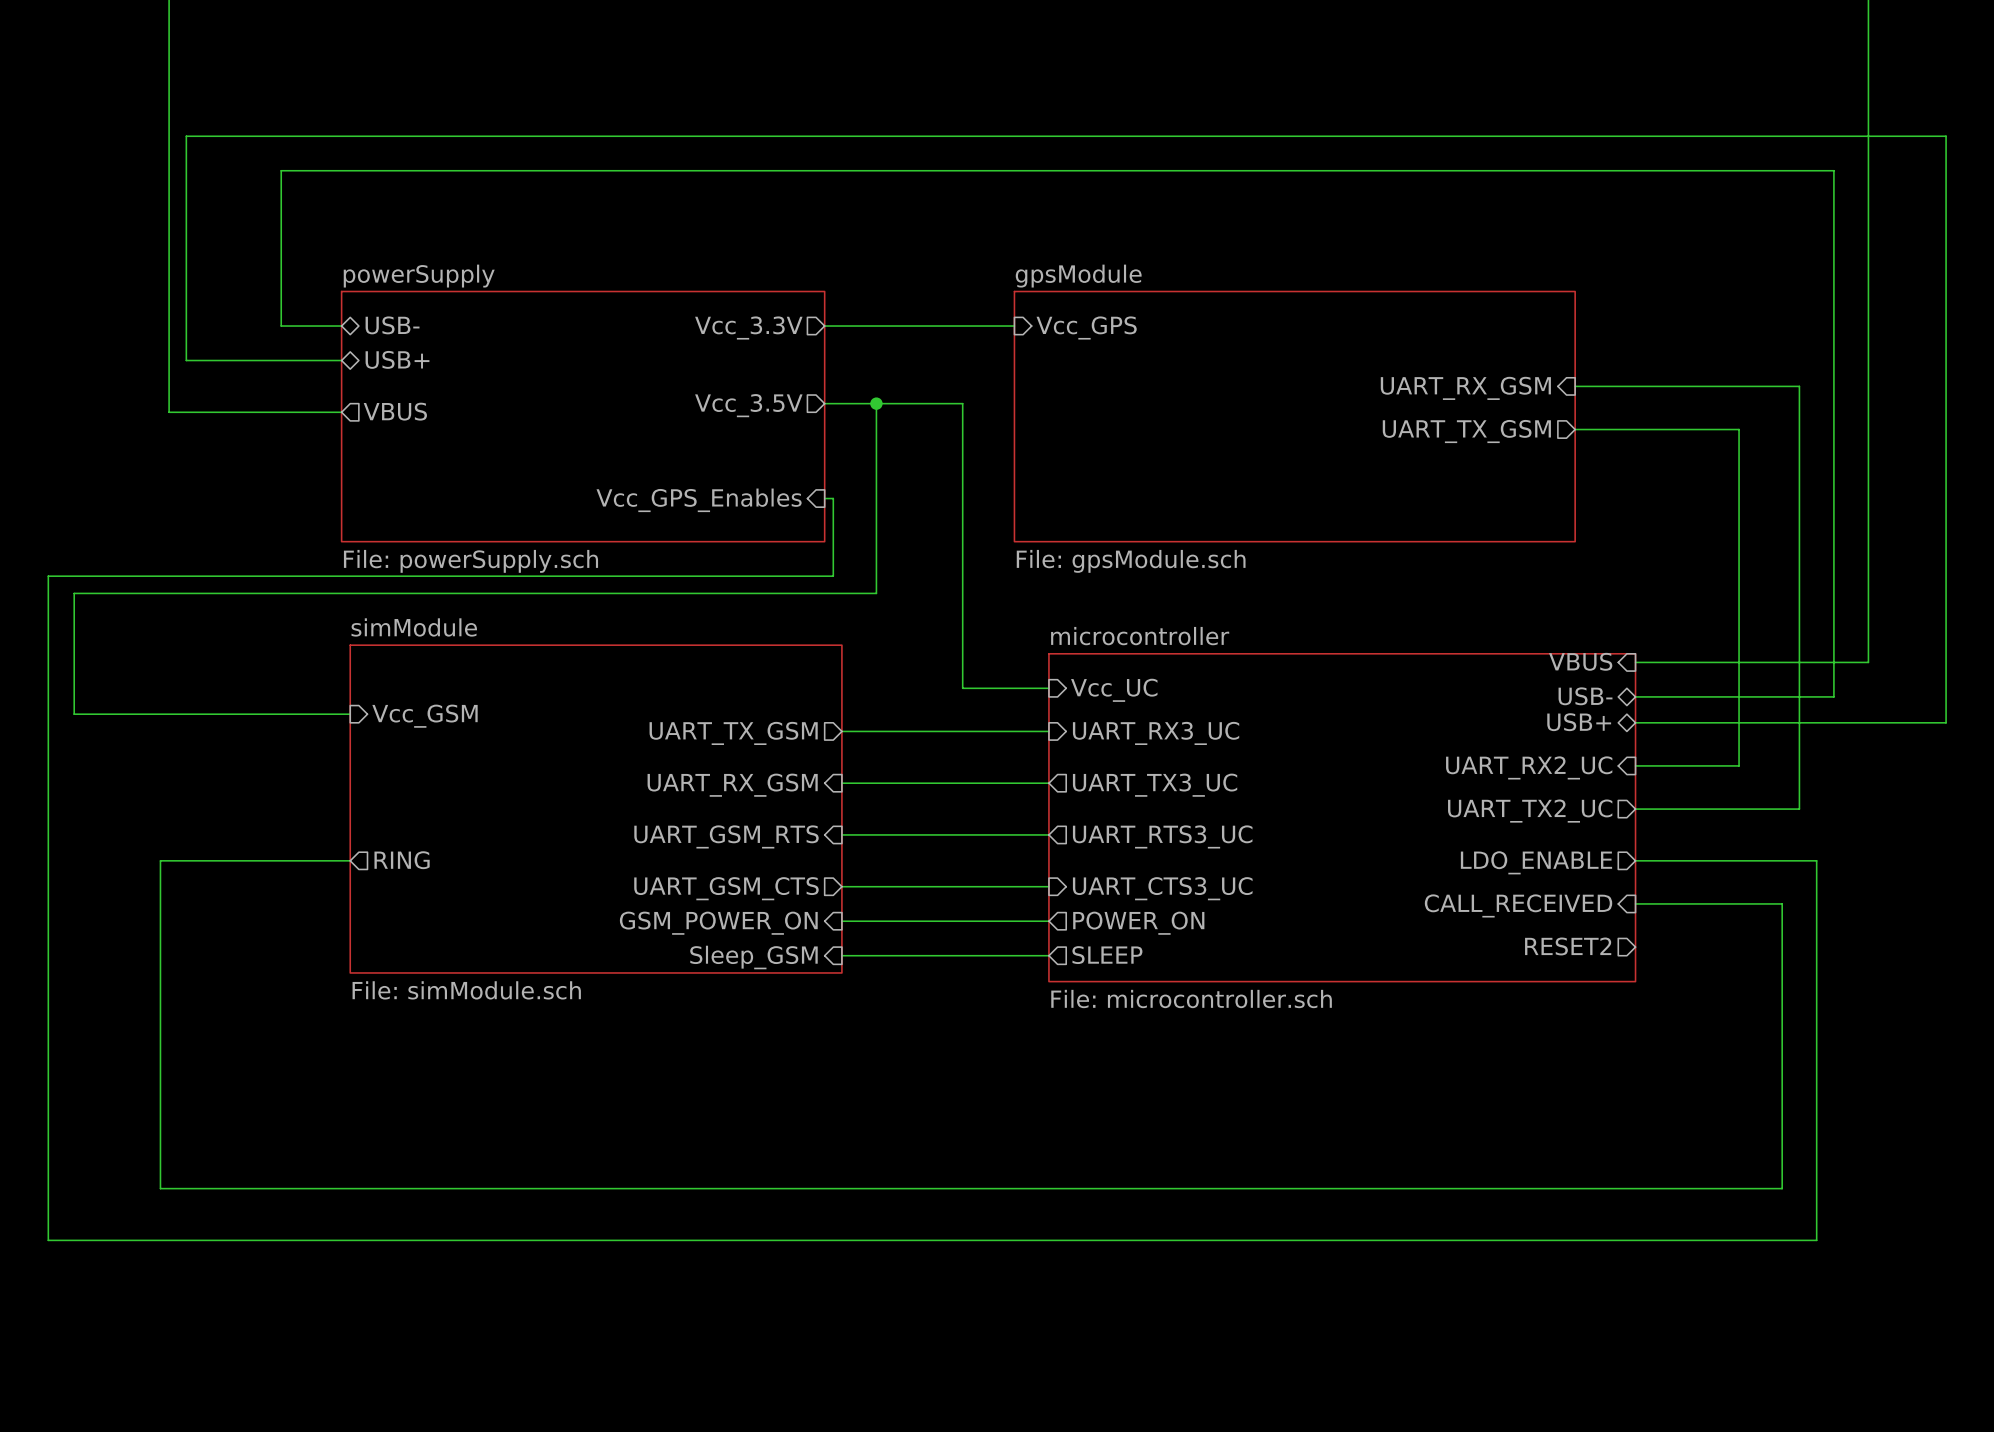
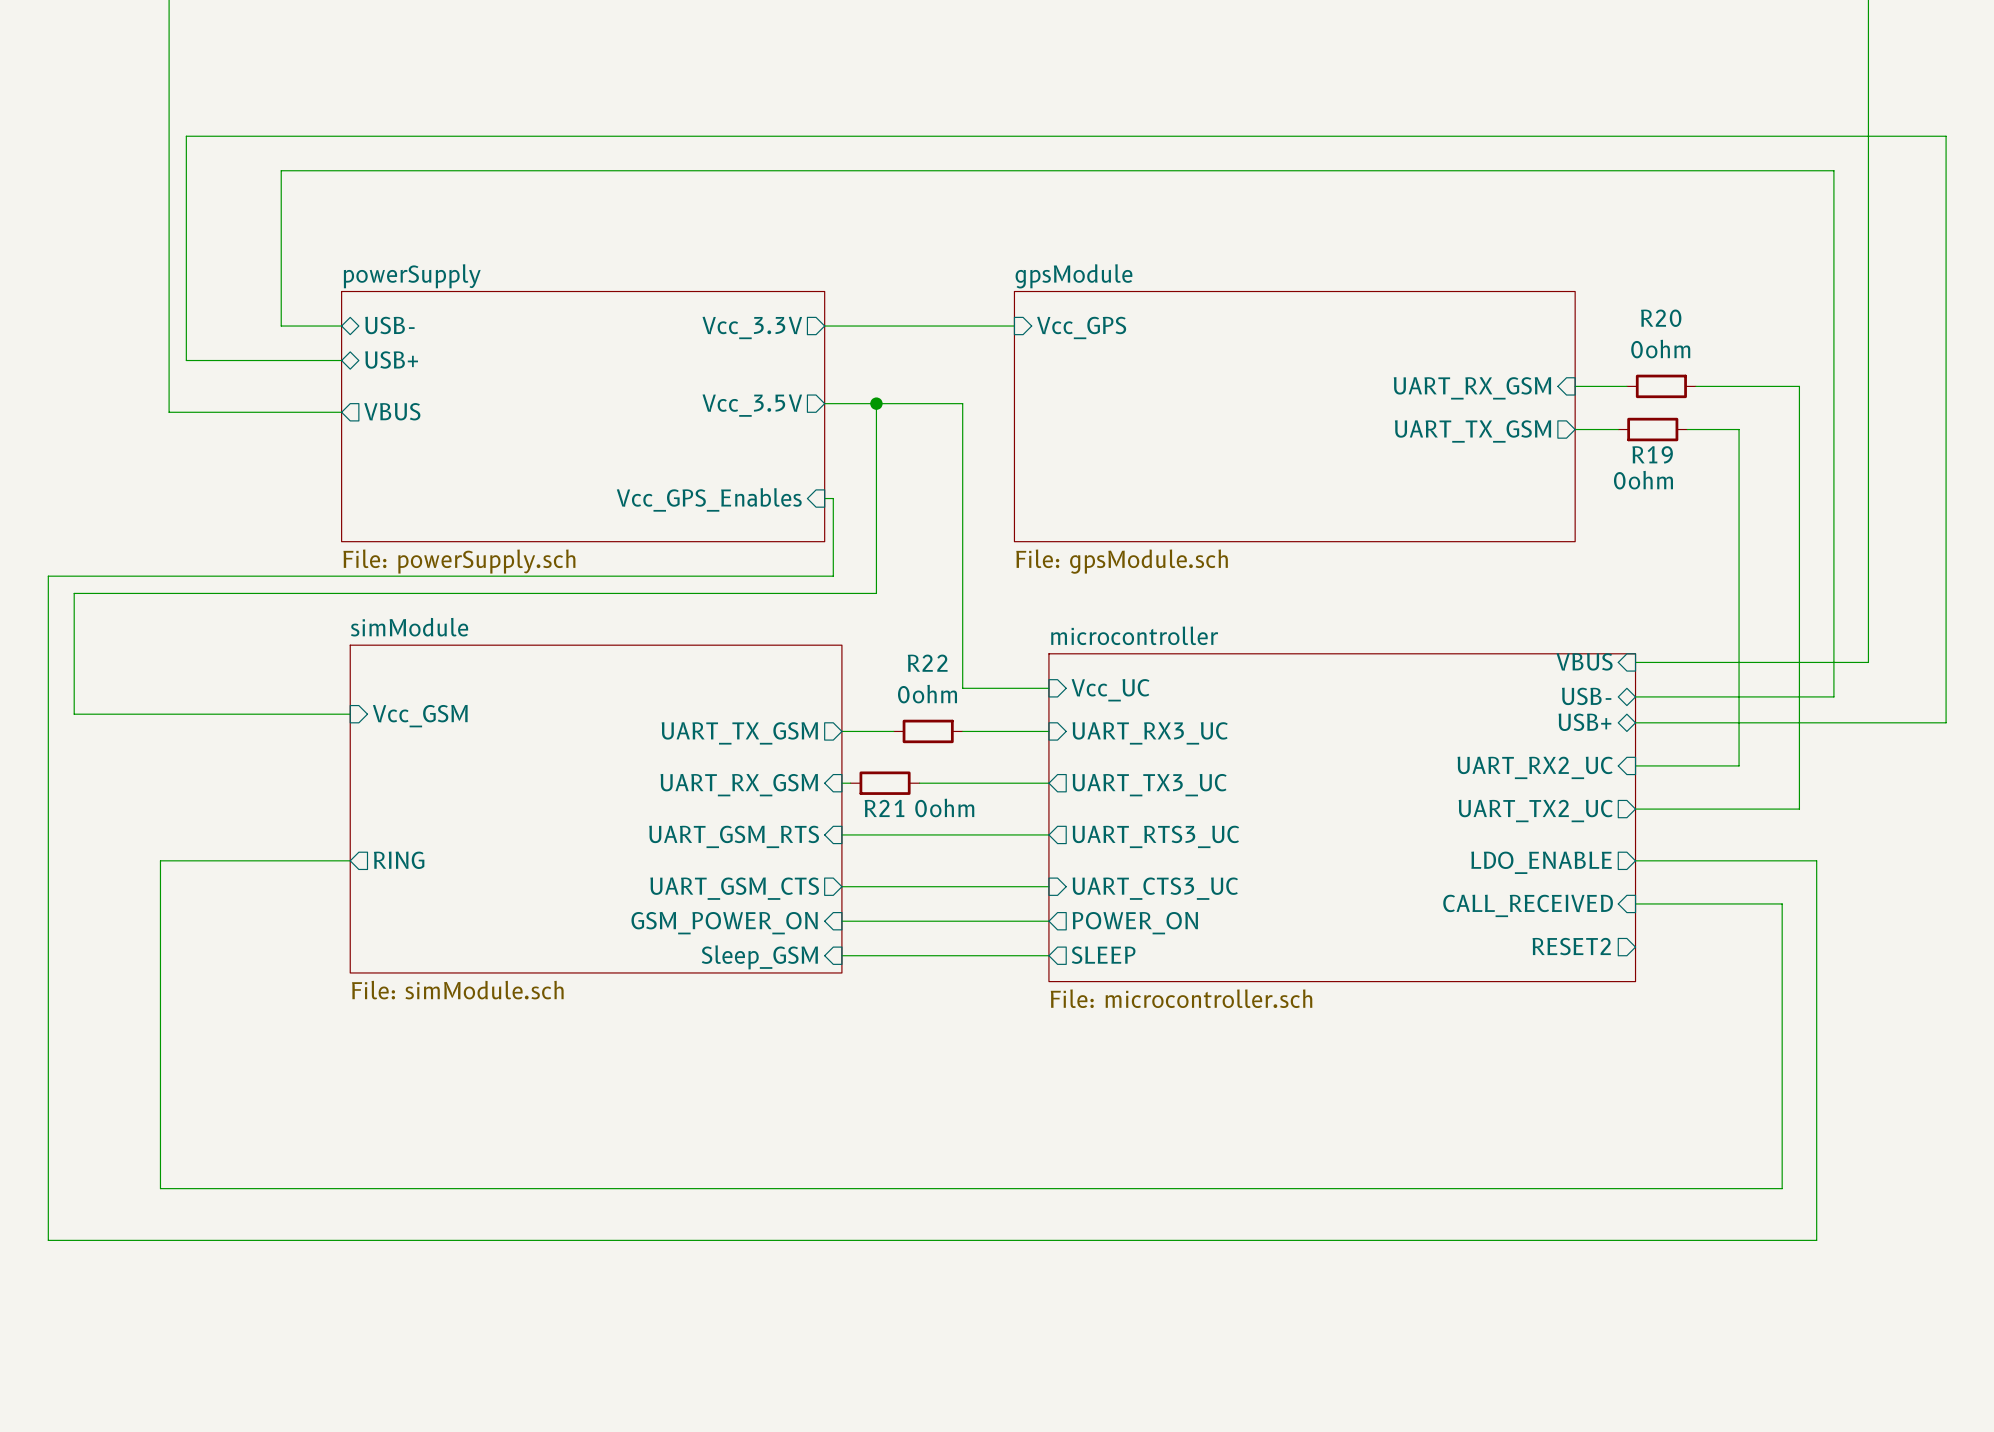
wire: (1626, 386) (1695, 386) -> none
R20: none -> 0ohm (1661, 386)
wire: (1618, 429) (1687, 429) -> none
R19: none -> 0ohm (1652, 429)
wire: (893, 731) (962, 731) -> none
R22: none -> 0ohm (928, 731)
wire: (850, 783) (919, 783) -> none
R21: none -> 0ohm (885, 783)

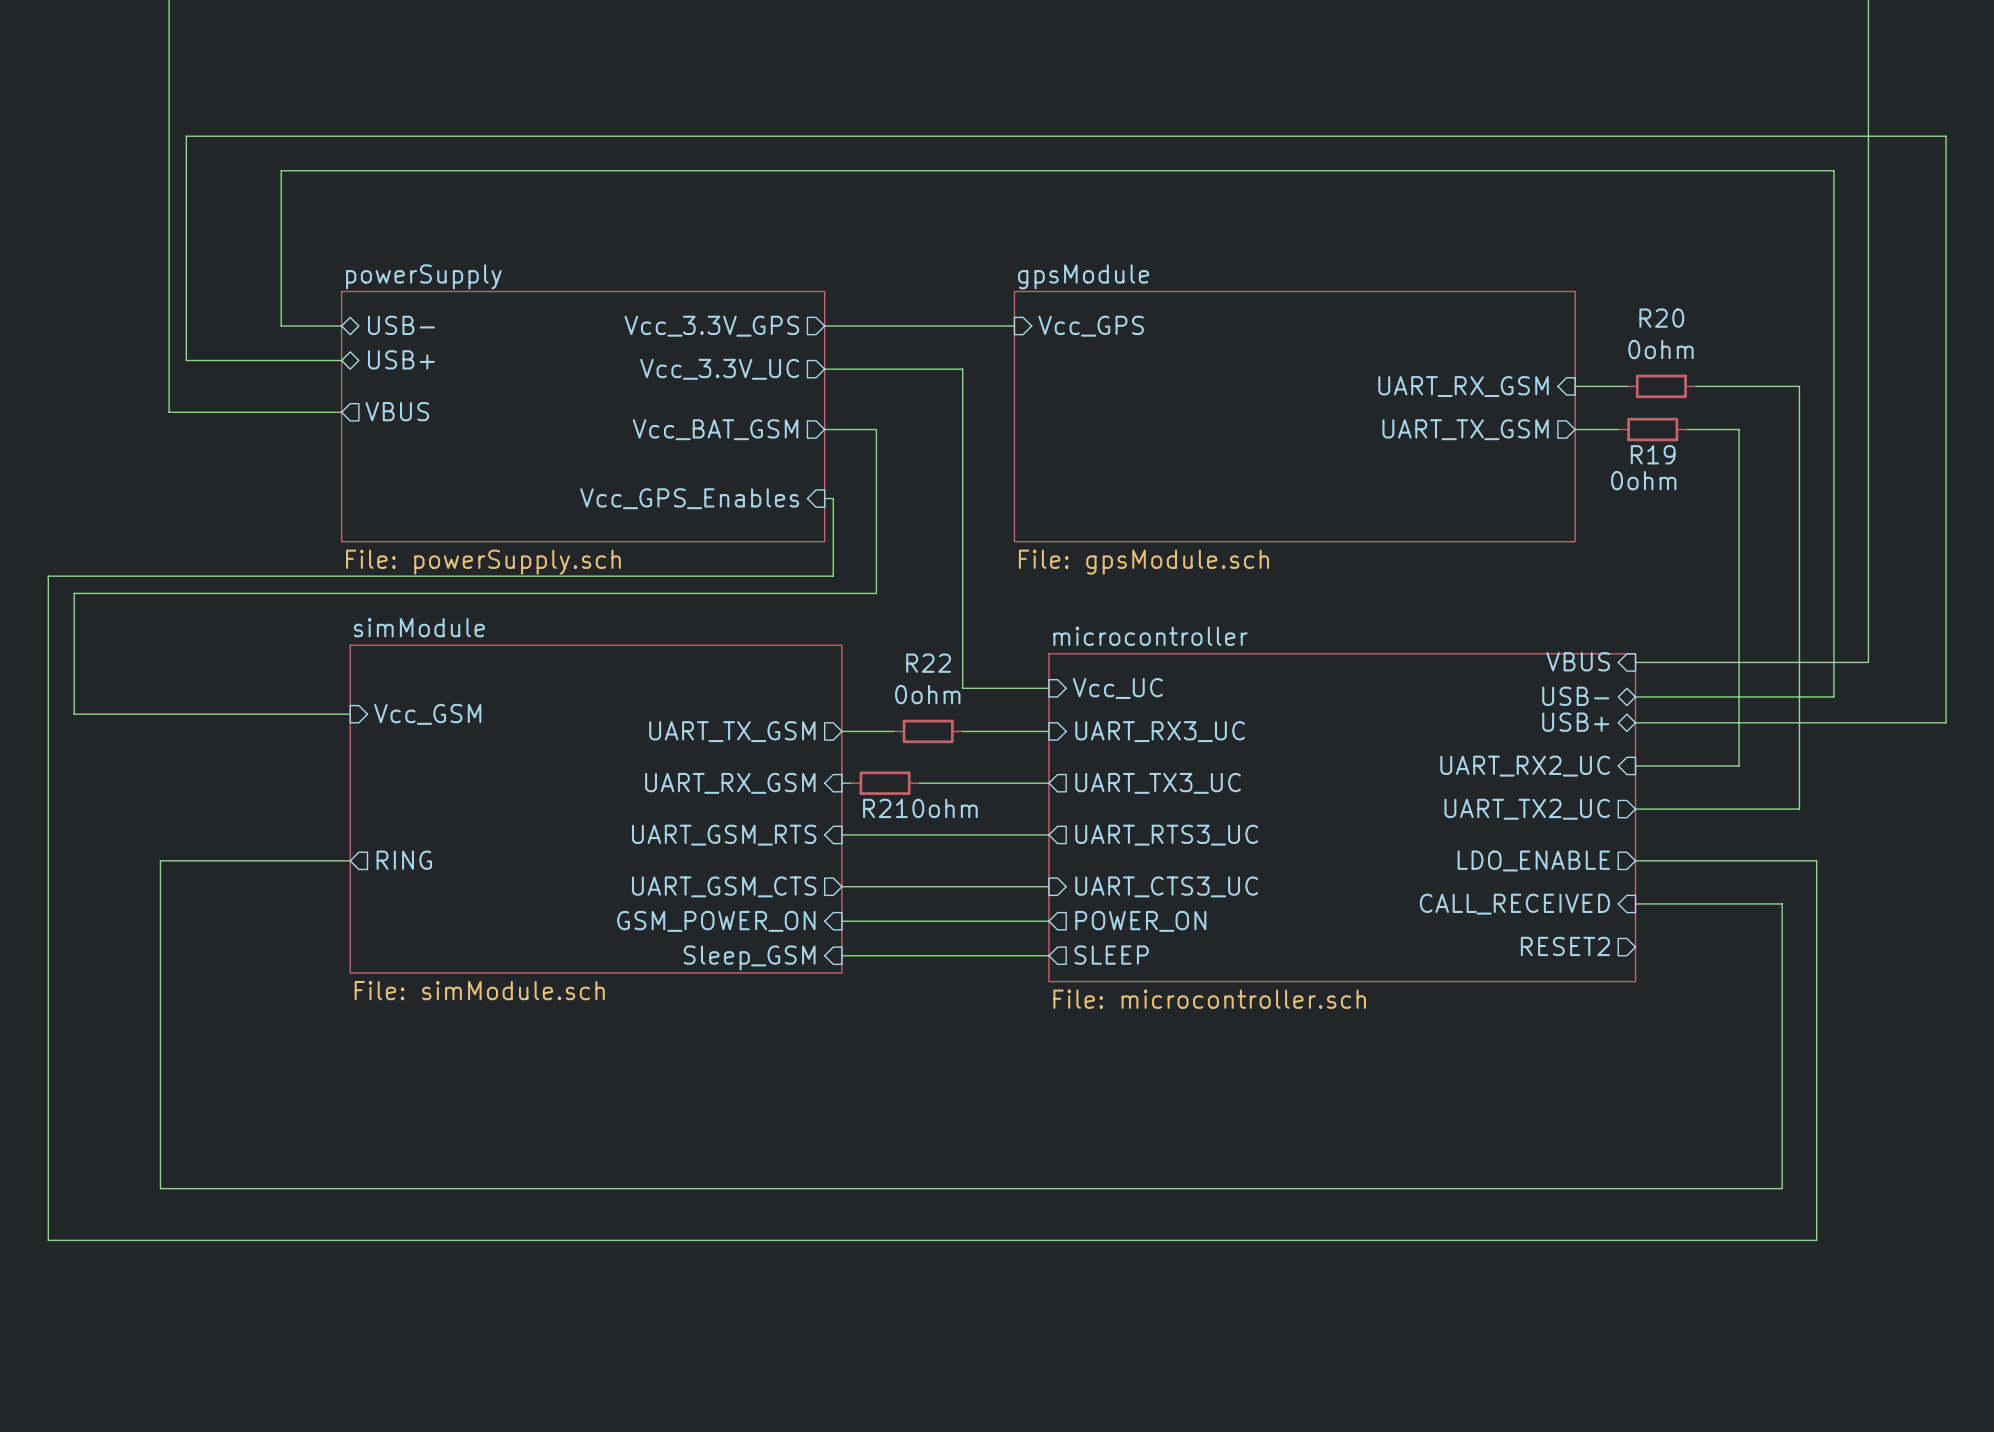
sheet pin: Vcc_3.3V (752, 327) -> Vcc_3.3V_GPS (711, 326)
wire: (824, 403) (962, 403) -> (824, 369) (962, 369) (962, 403)
wire: (876, 403) (876, 429) -> (824, 429) (876, 429)
junction: (876, 403) -> none
sheet pin: Vcc_3.5V (752, 405) -> Vcc_3.3V_UC (719, 369)
sheet pin: none -> Vcc_BAT_GSM (715, 429)

